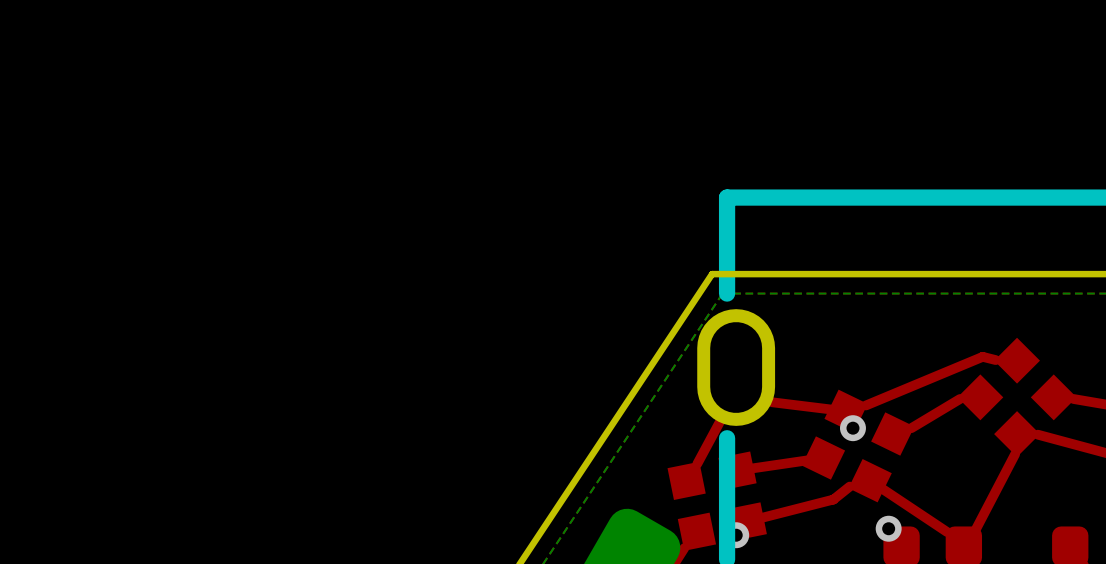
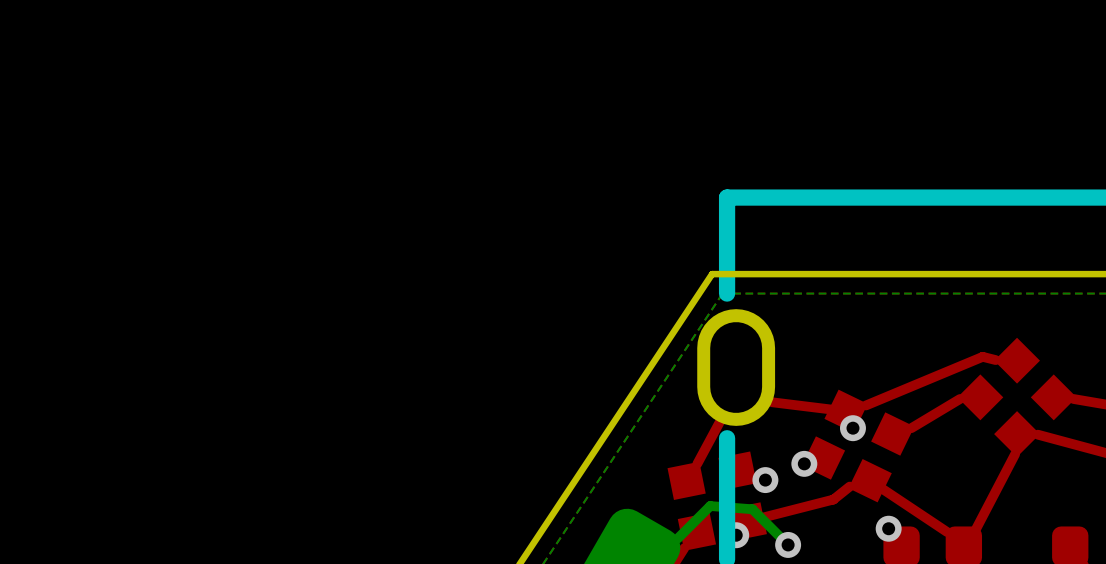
top track: (823, 458) (737, 470) -> none
via: none -> (804, 463)
via: none -> (765, 480)
bottom track: none -> (677, 538) (710, 506) (752, 509) (788, 544)
via: none -> (788, 544)

